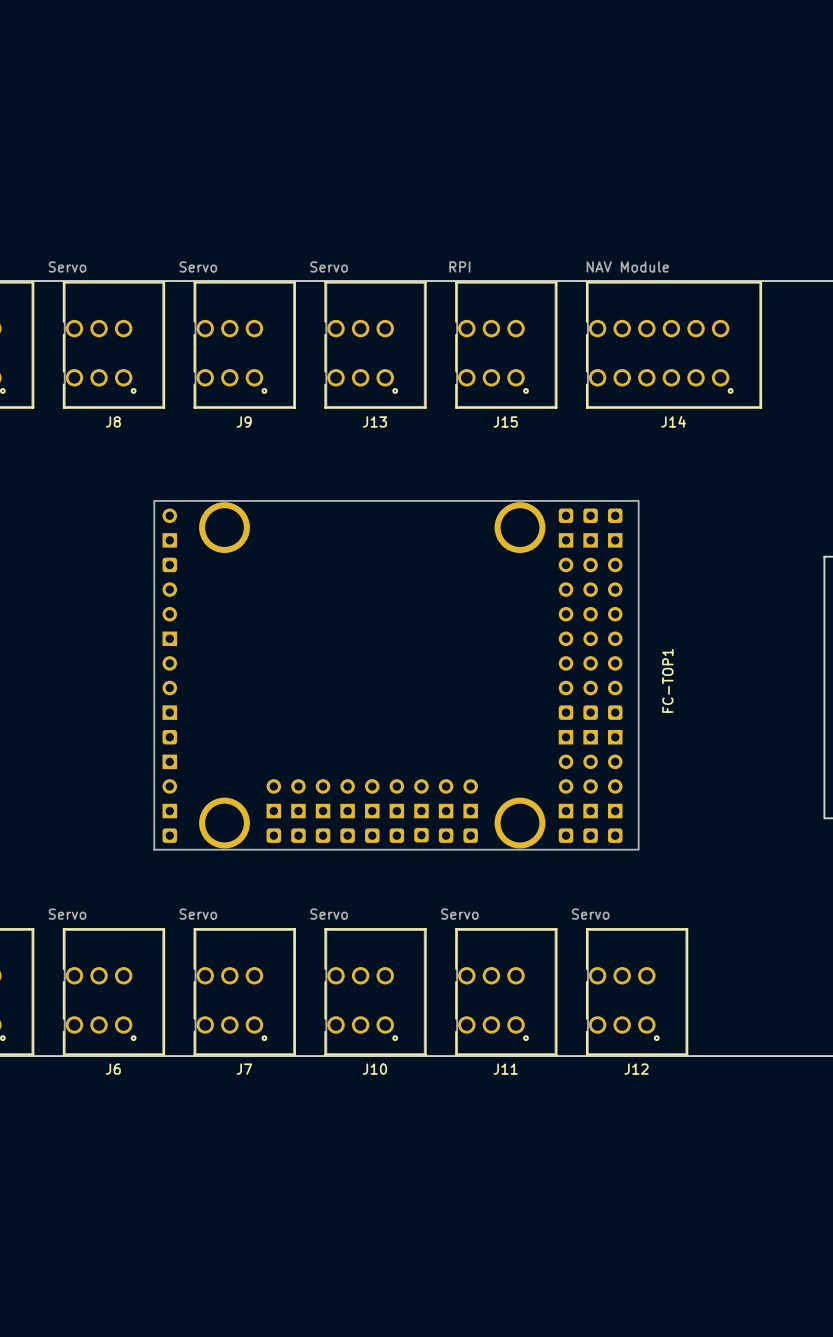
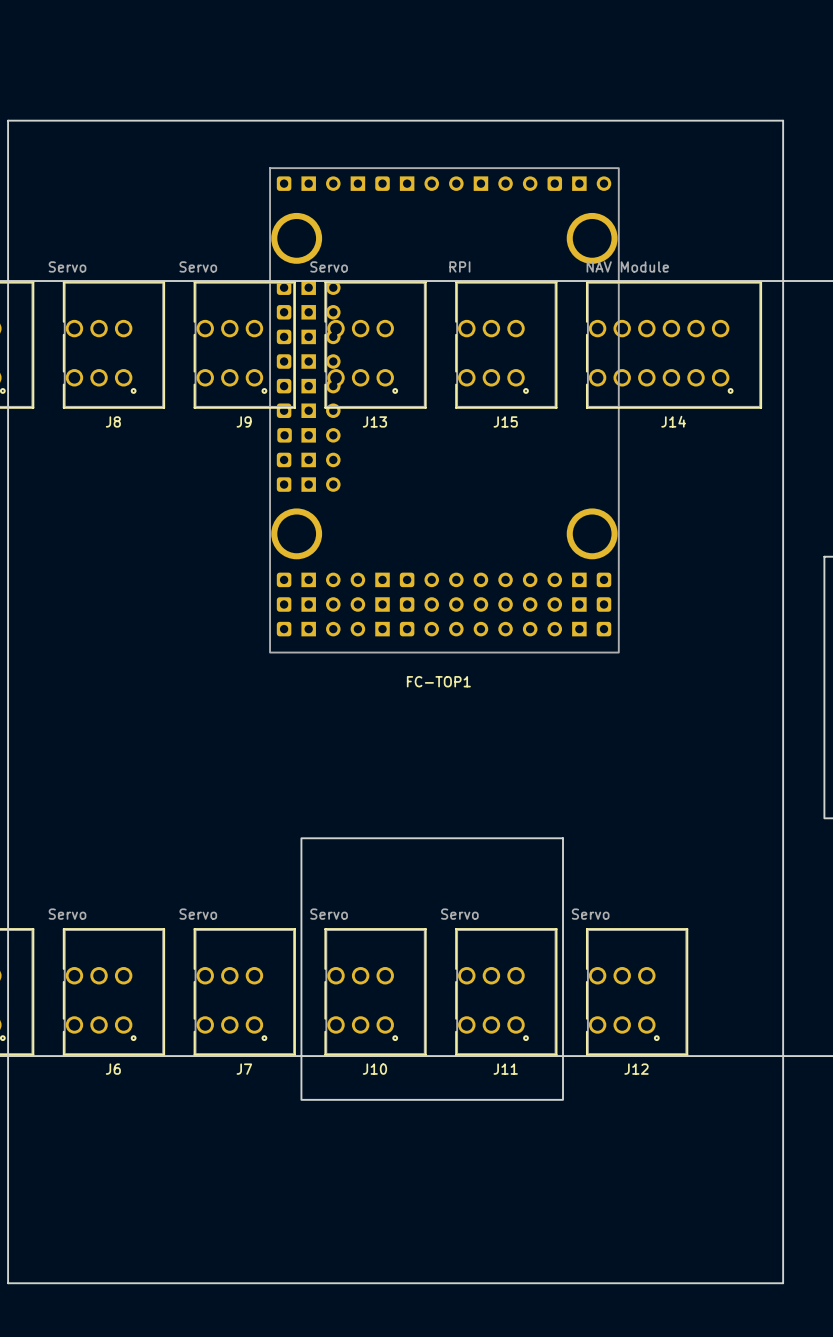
board edge: none -> (8, 120) (783, 120) (783, 1283) (8, 1283) (8, 120)
FC-TOP1 rotation: 0° (396, 675) -> 90° clockwise (444, 410)
part: none -> (432, 969)

